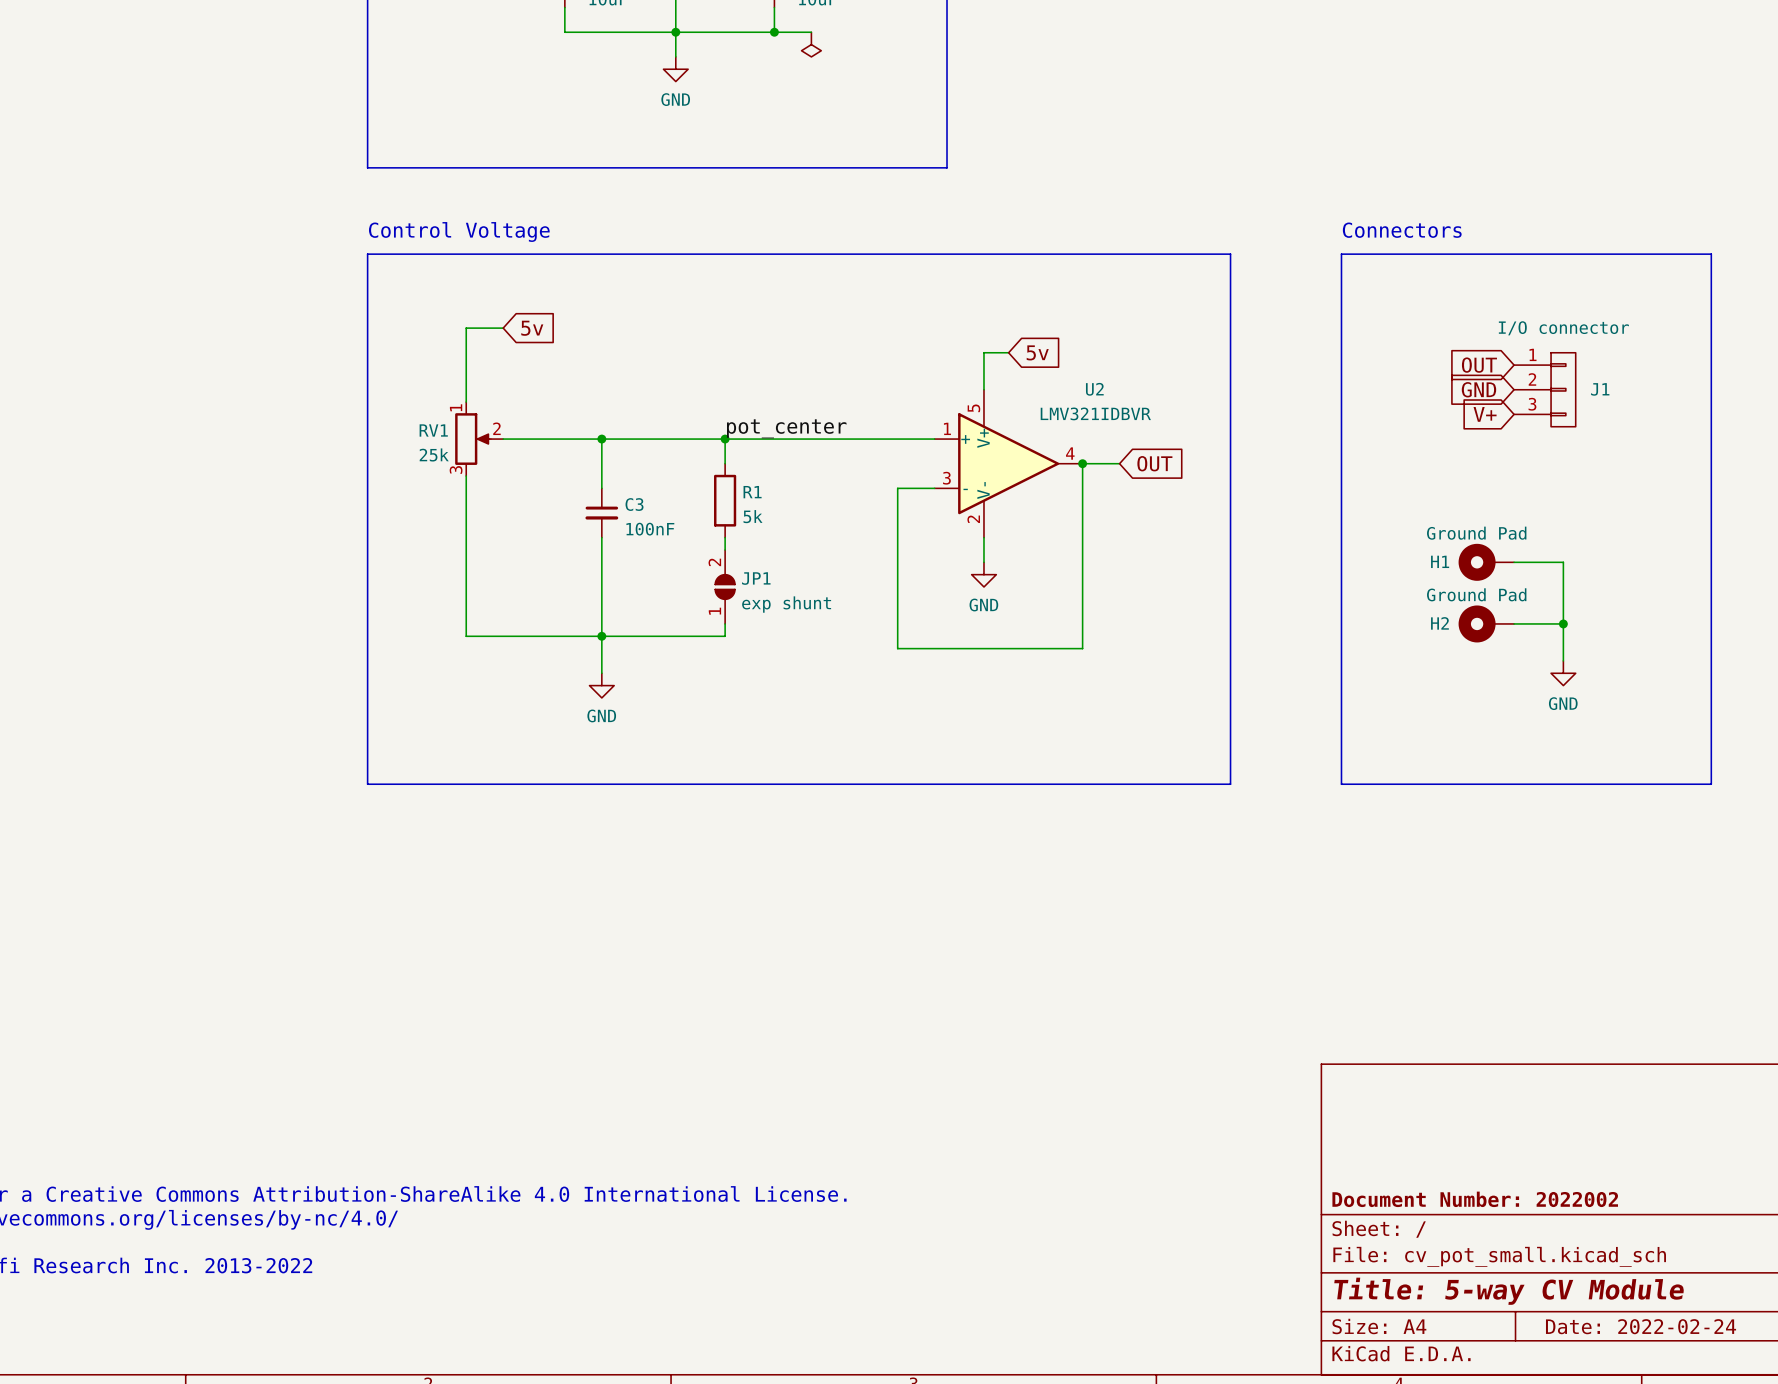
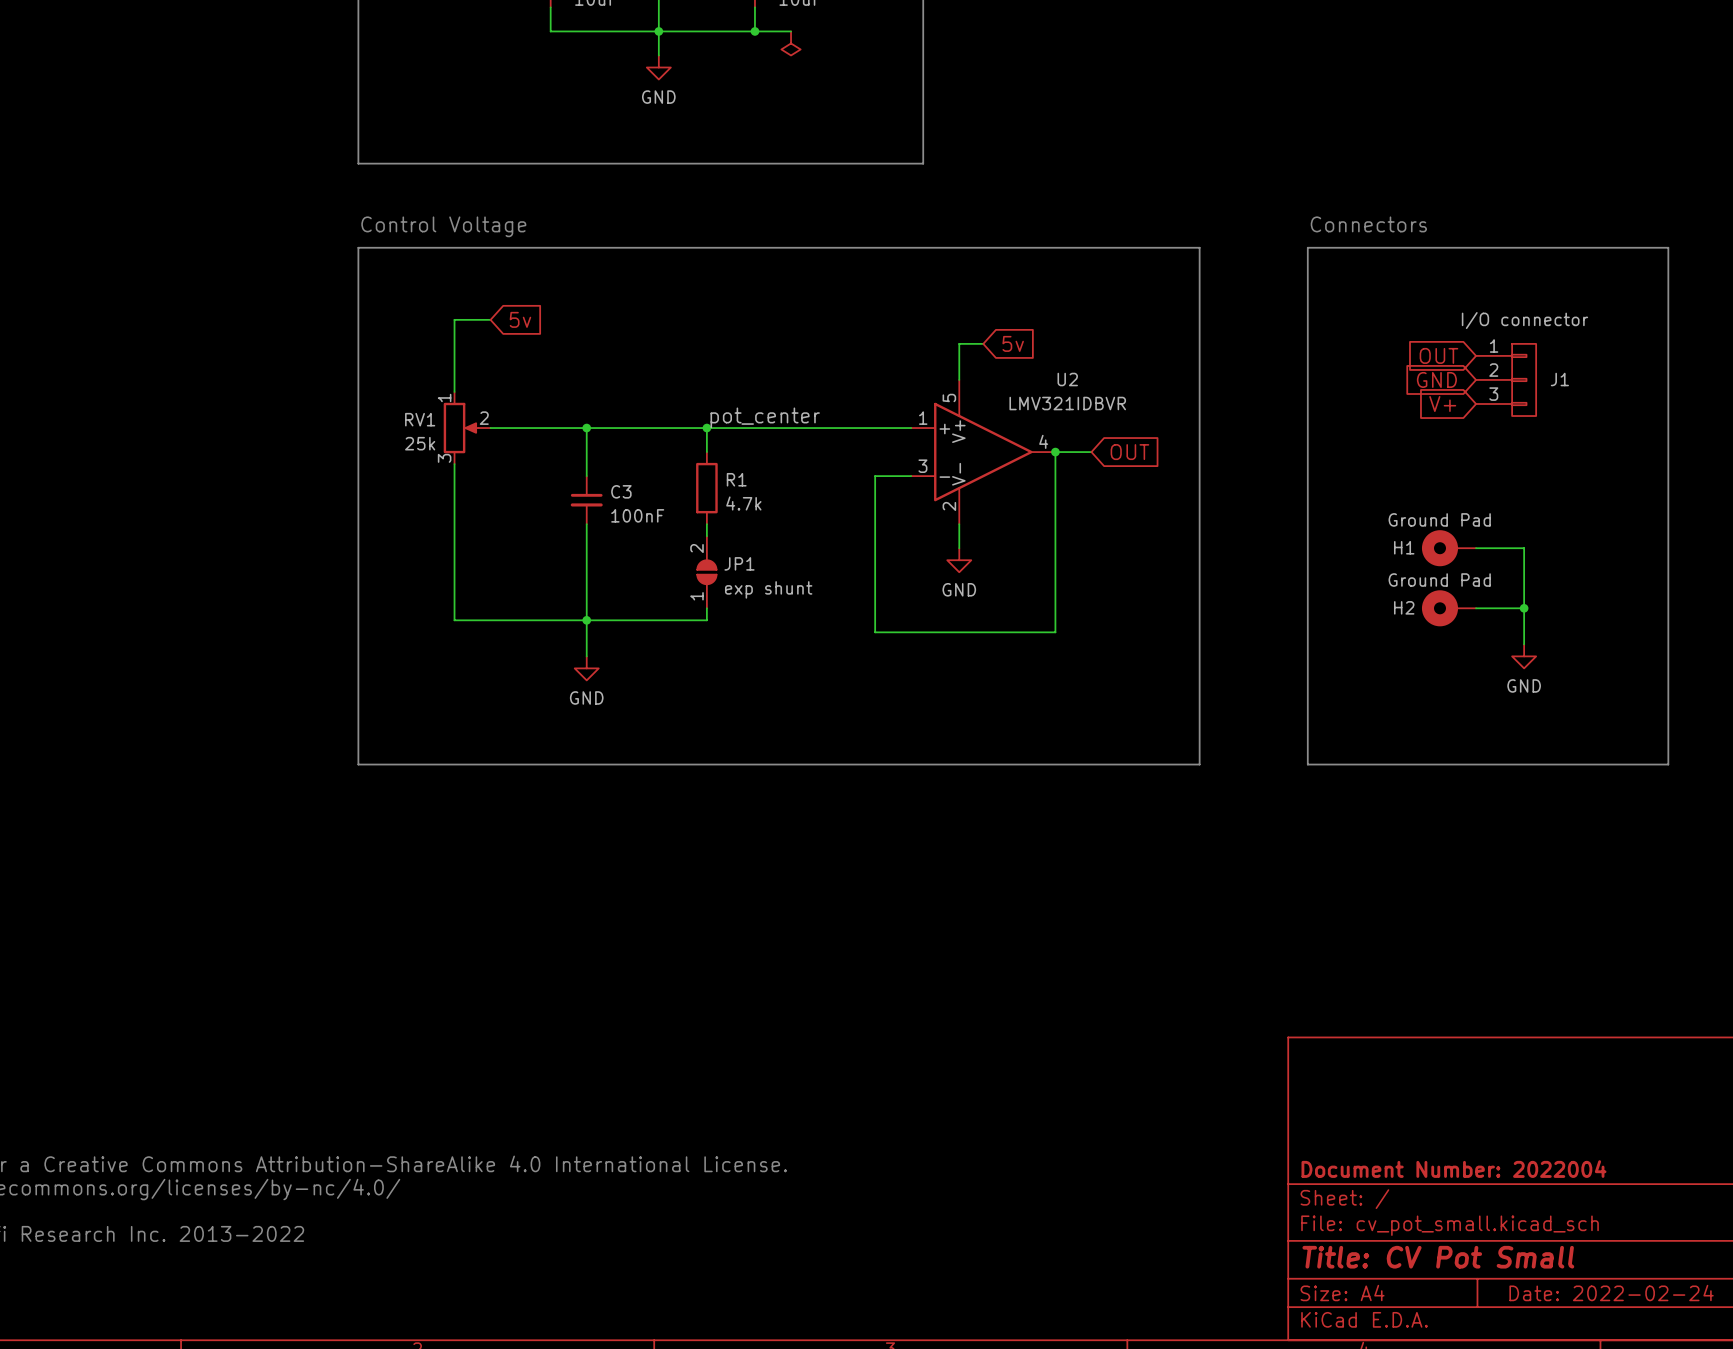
R1 value: 5k (753, 516) -> 4.7k (743, 503)
title block: Document Number: 2022002 (1475, 1199) -> Document Number: 2022004 (1453, 1169)
title block: Title: 5-way CV Module (1509, 1291) -> Title: CV Pot Small (1438, 1257)

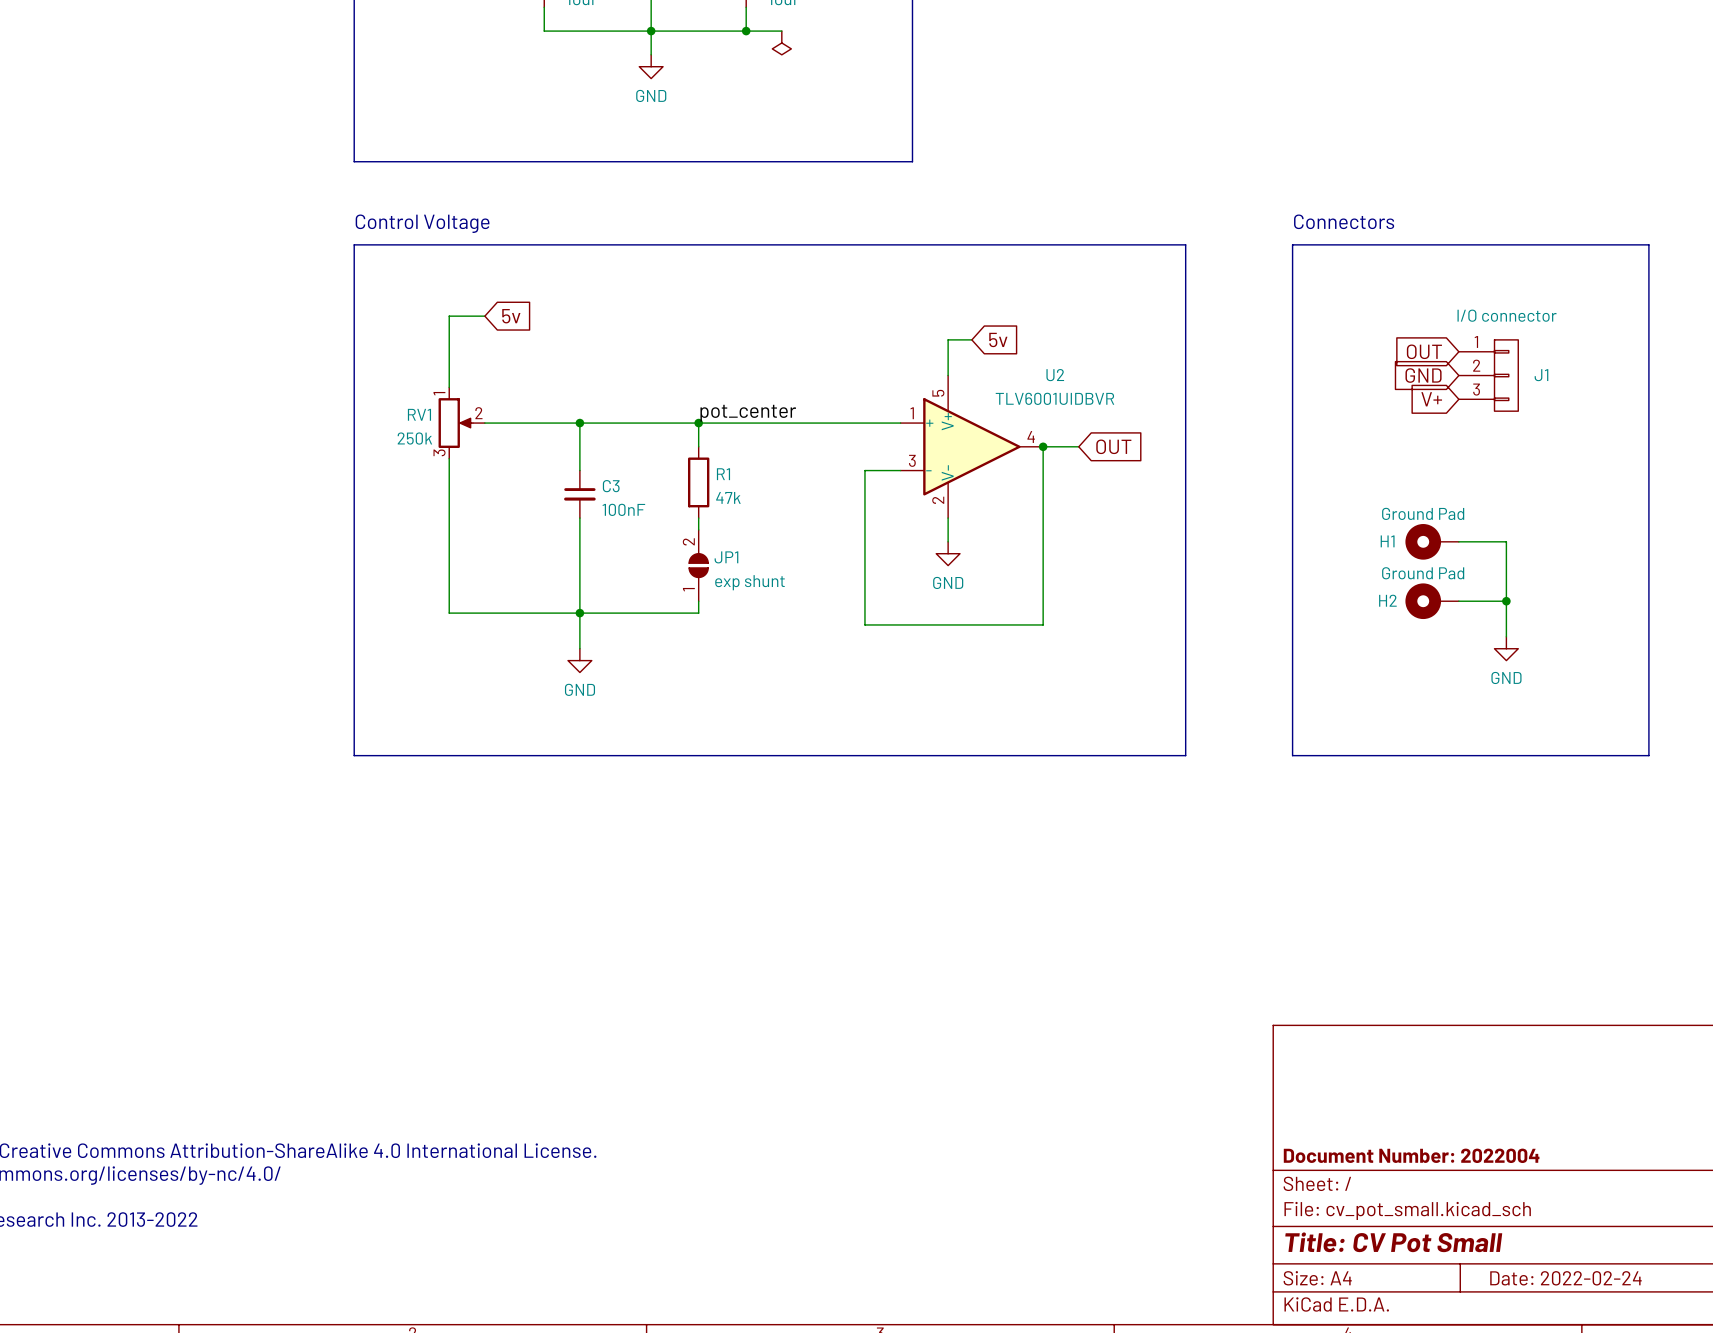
U2 value: LMV321IDBVR (1067, 403) -> TLV6001UIDBVR (1054, 398)
RV1 value: 25k (420, 443) -> 250k (414, 438)
R1 value: 4.7k (743, 503) -> 47k (728, 497)

